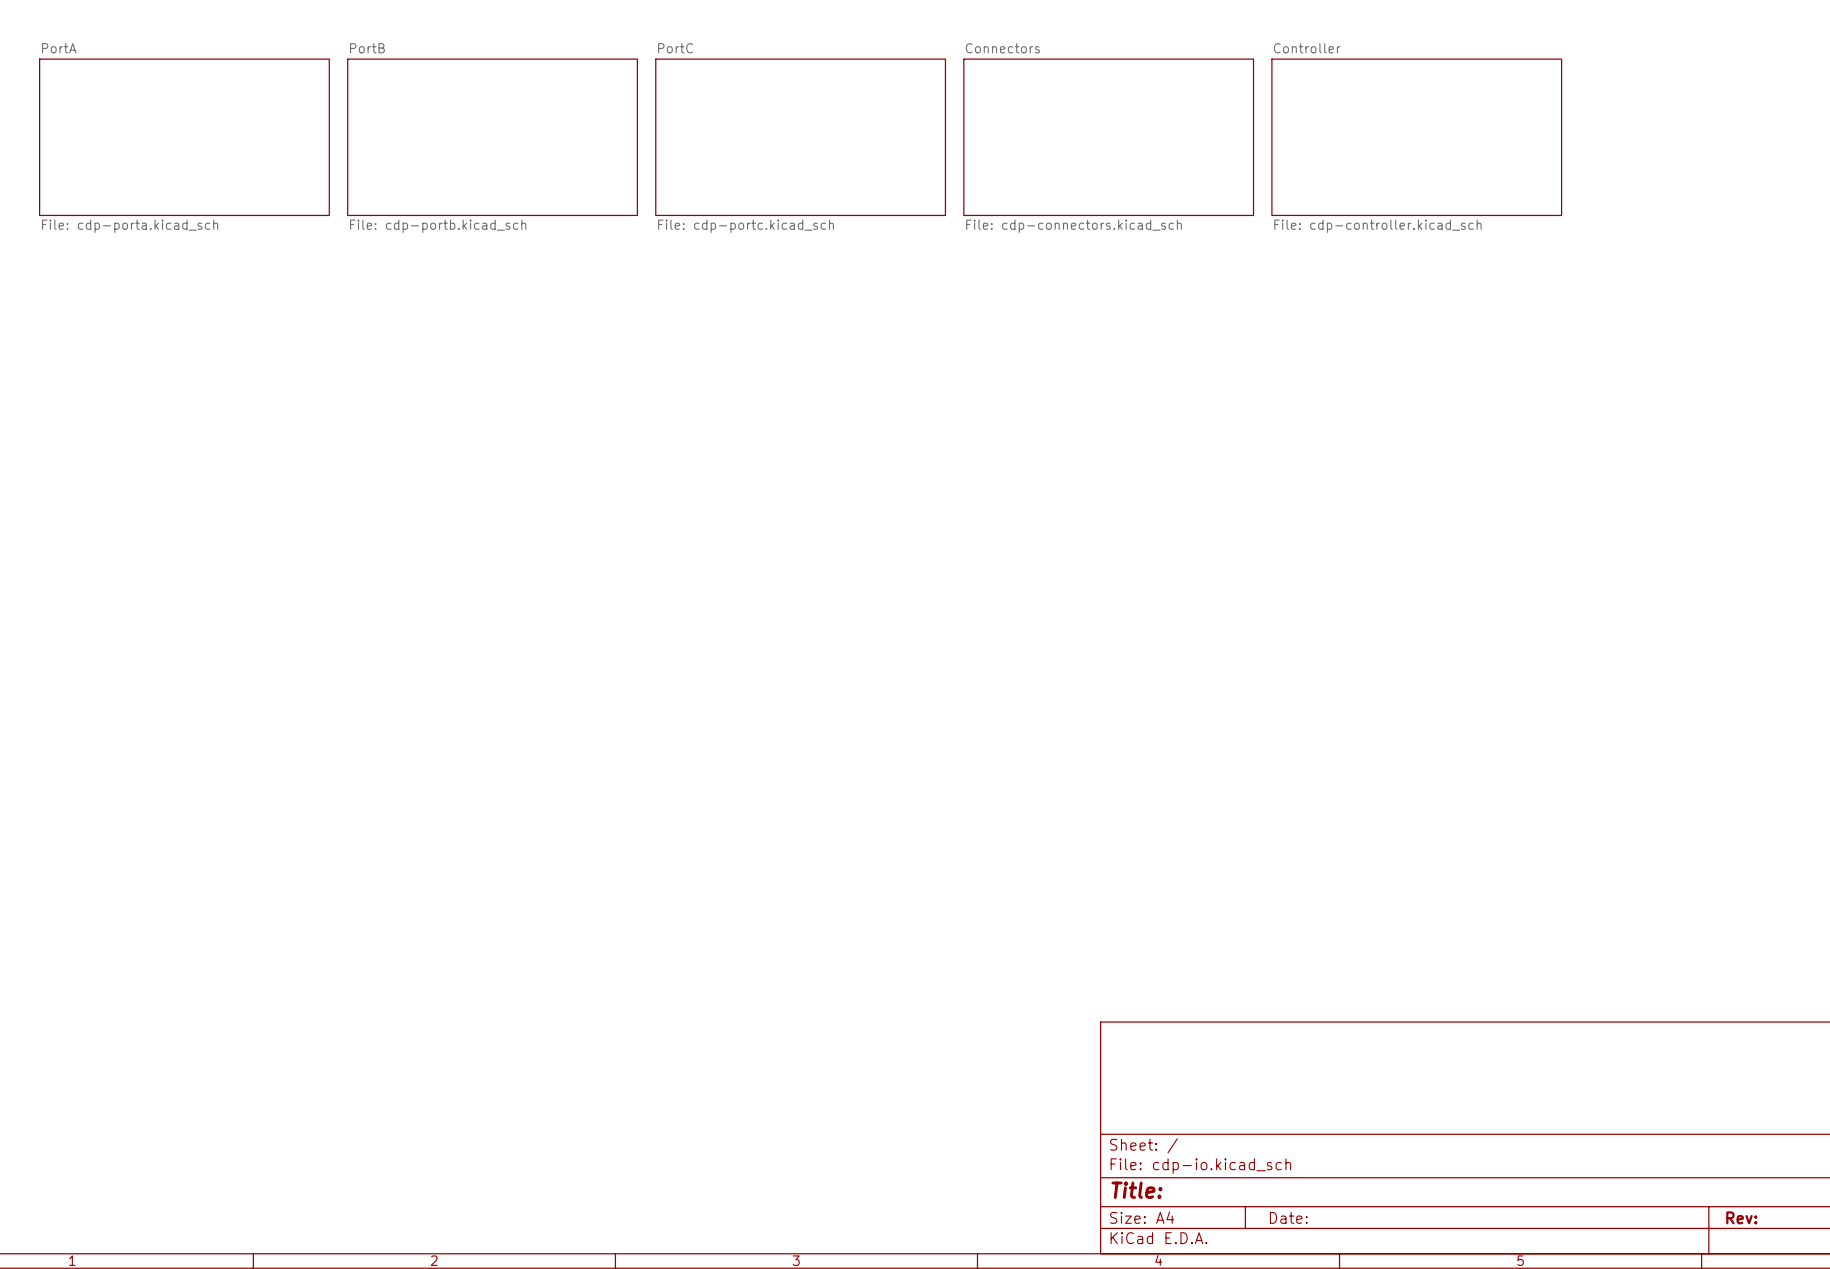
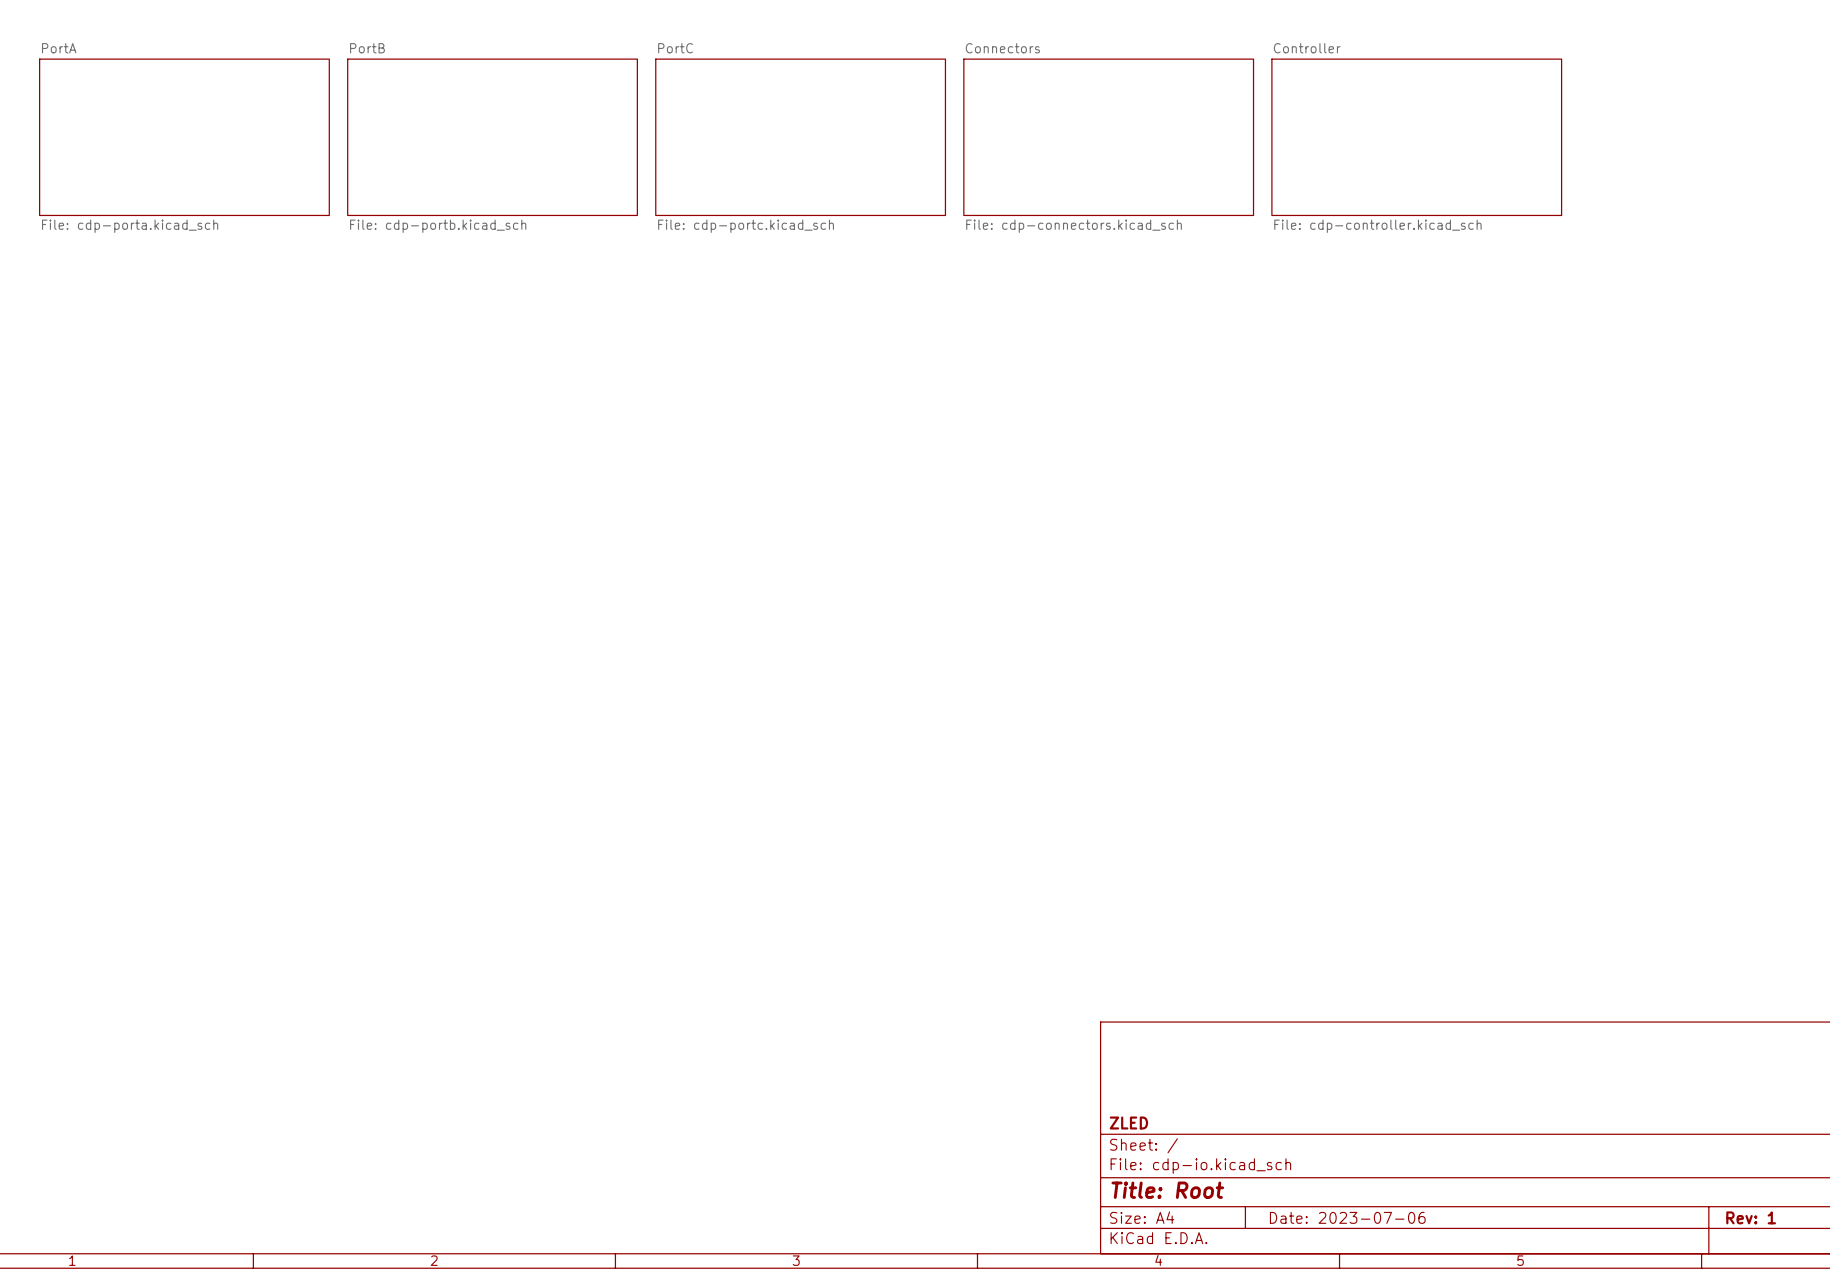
title block: none -> ZLED (1128, 1123)
title block: Title: (1137, 1190) -> Title: Root (1167, 1190)
title block: Date: (1288, 1217) -> Date: 2023-07-06 (1347, 1217)
title block: Rev: (1741, 1217) -> Rev: 1 (1751, 1217)

